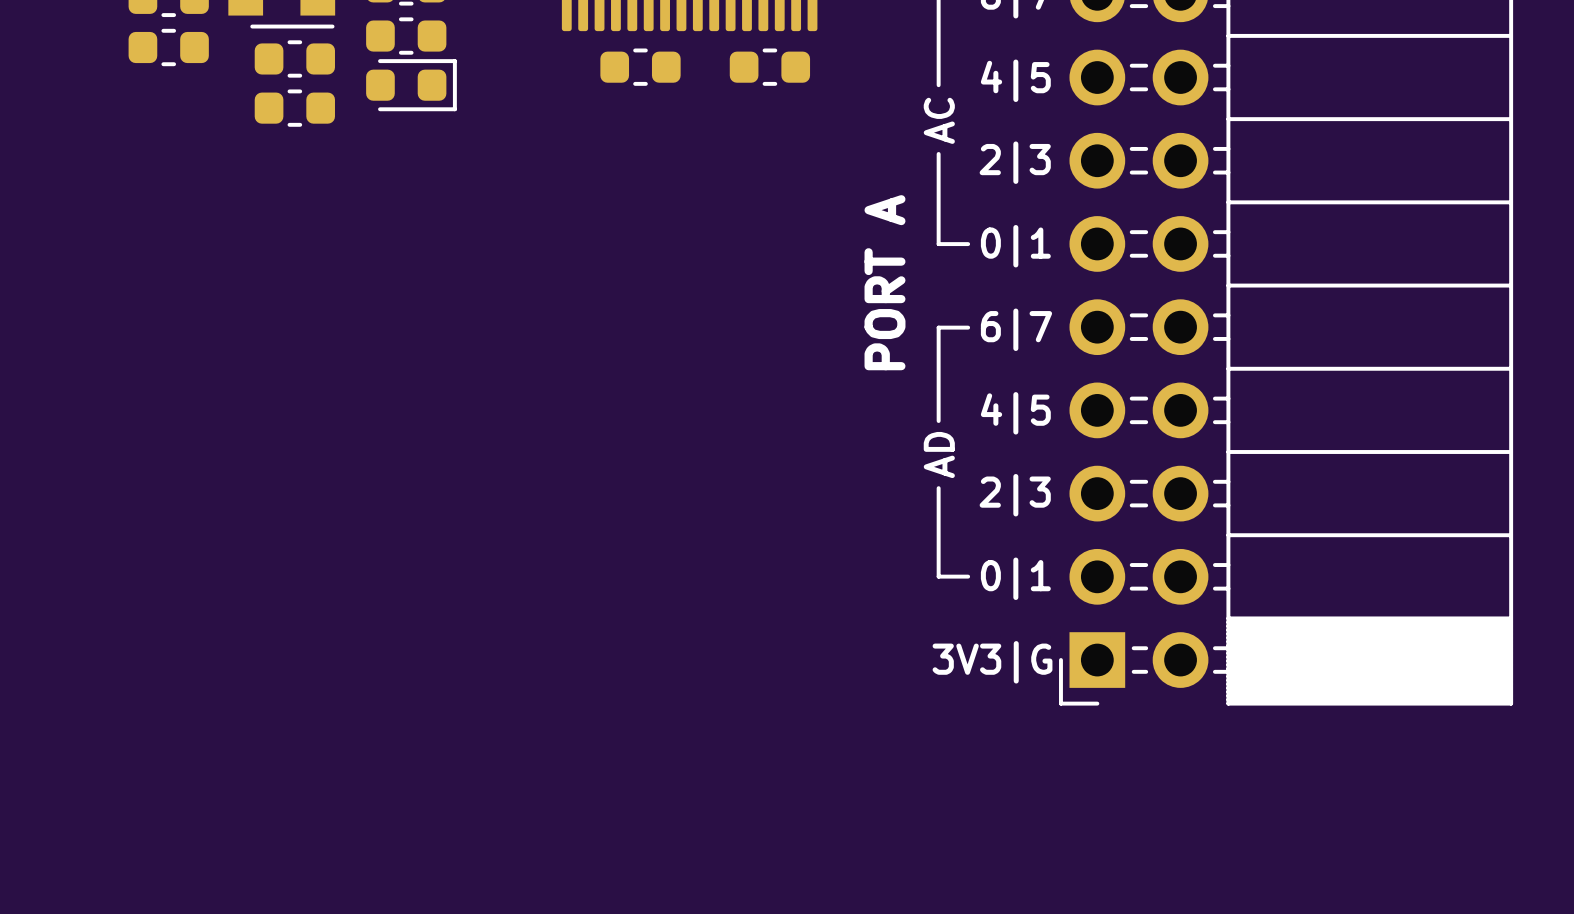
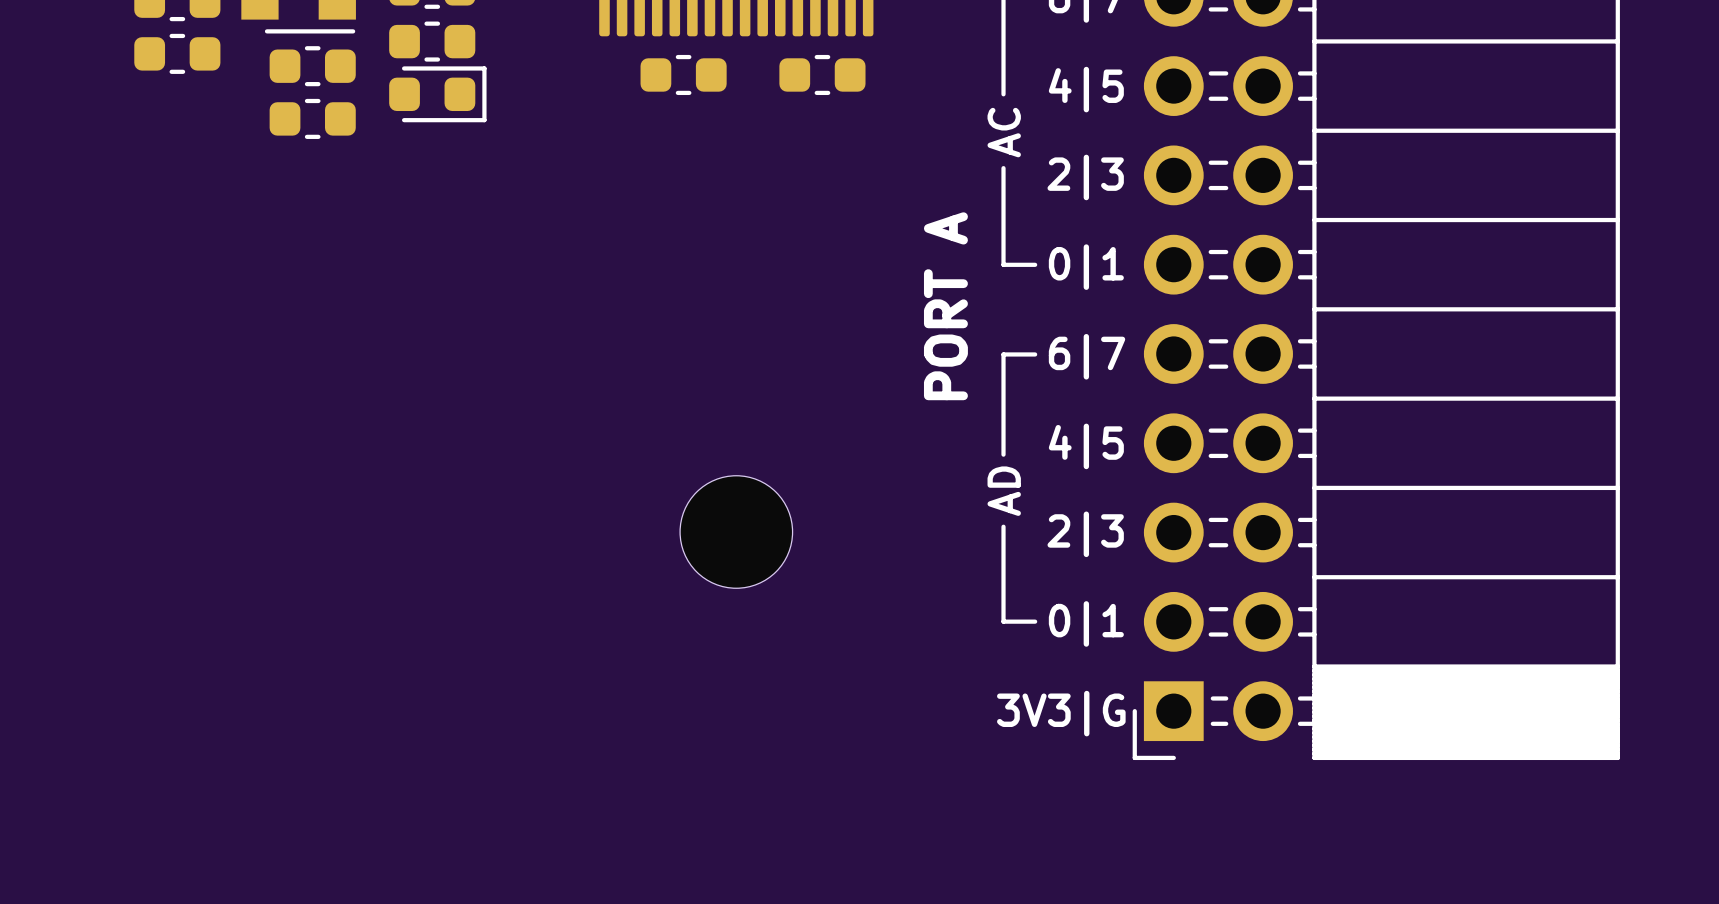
part: none -> (736, 532)

